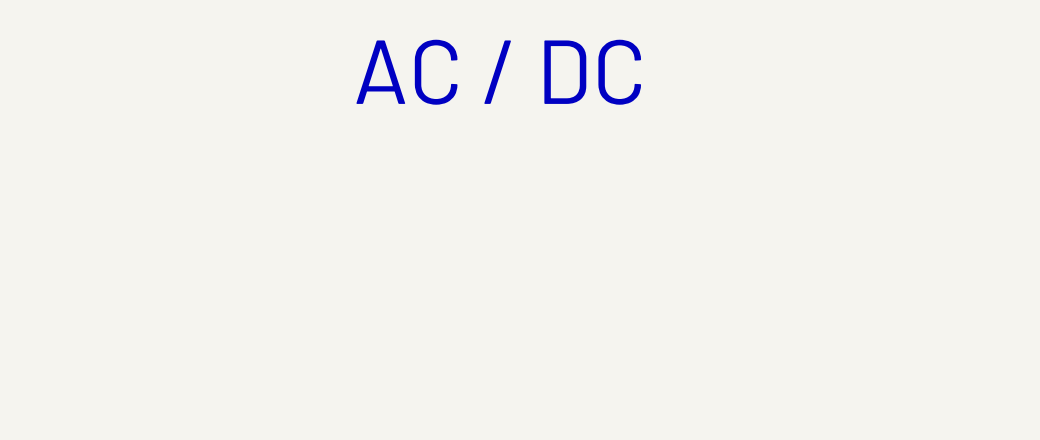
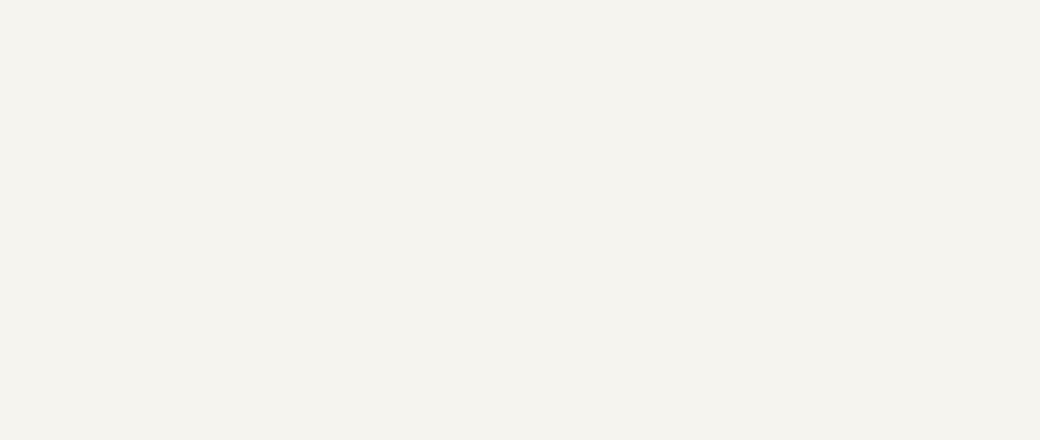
text: AC / DC (498, 72) -> none

